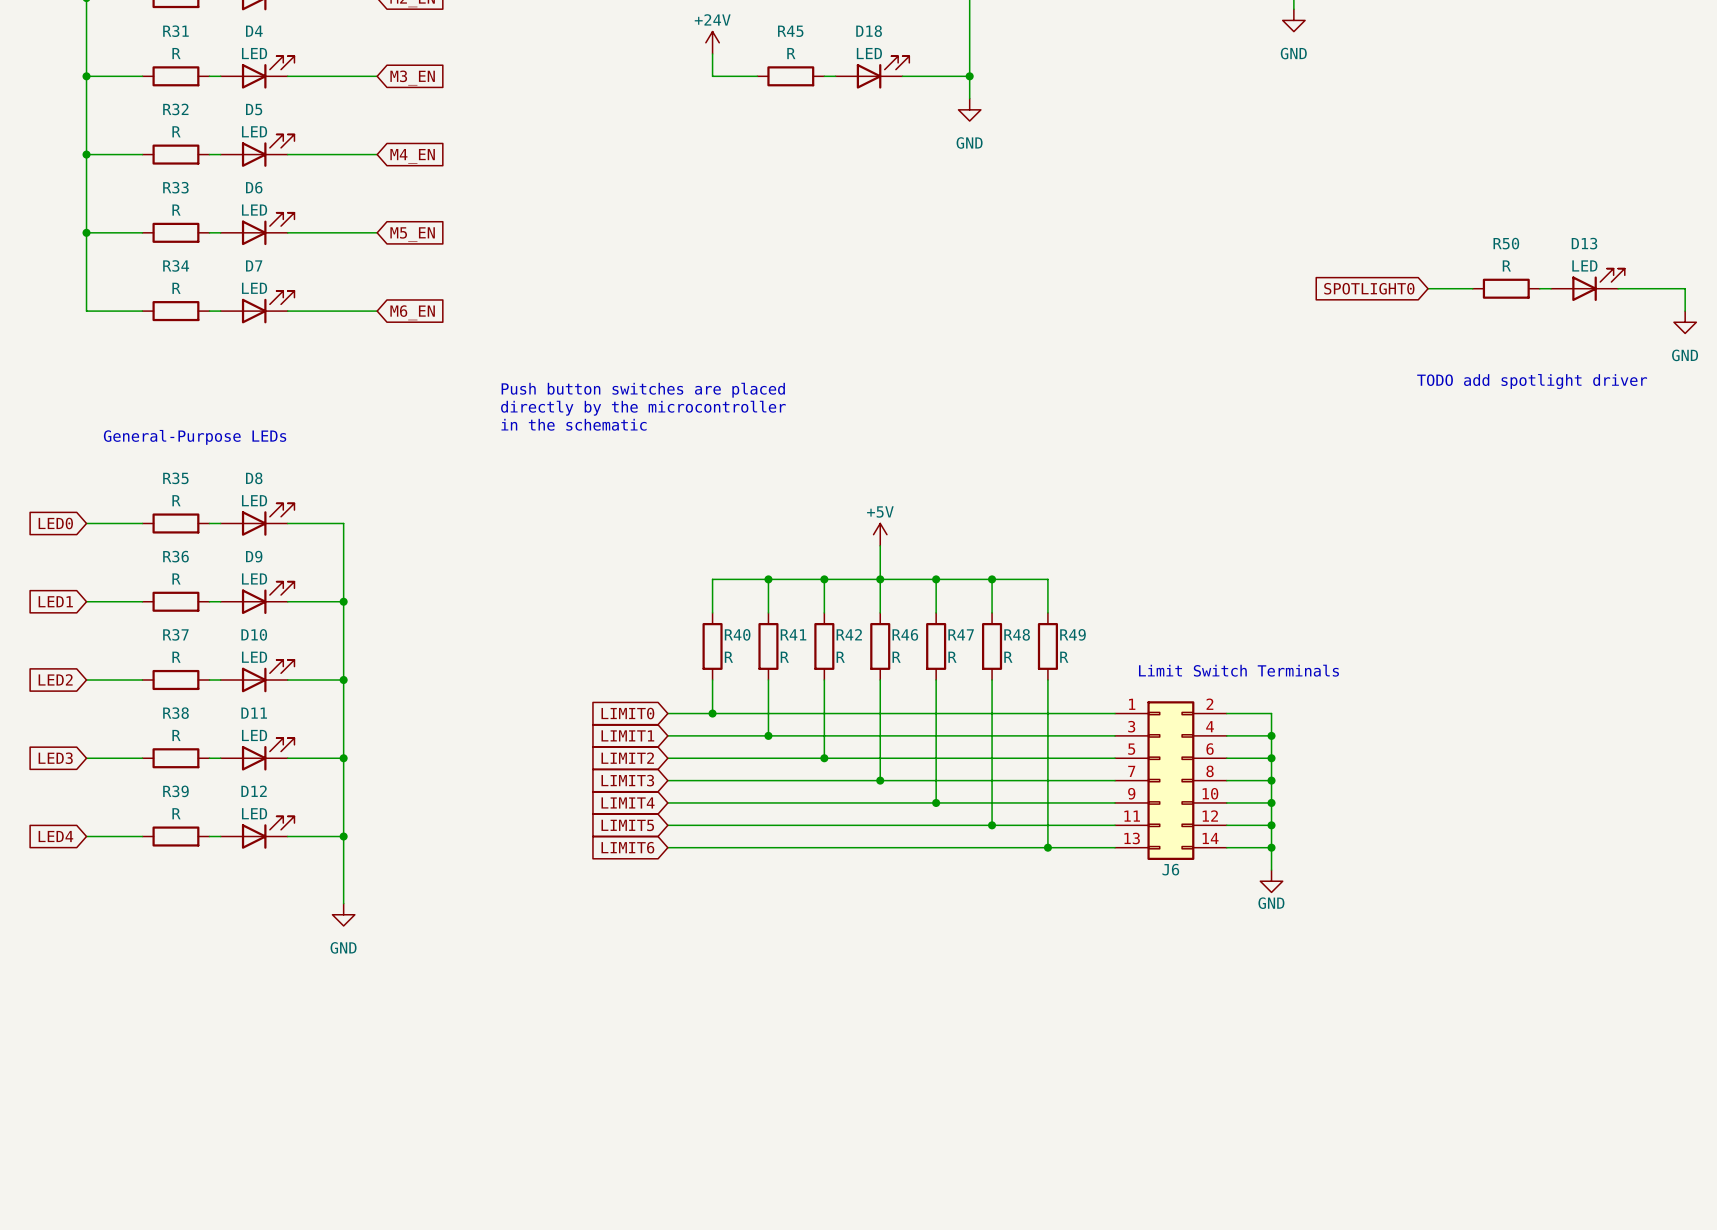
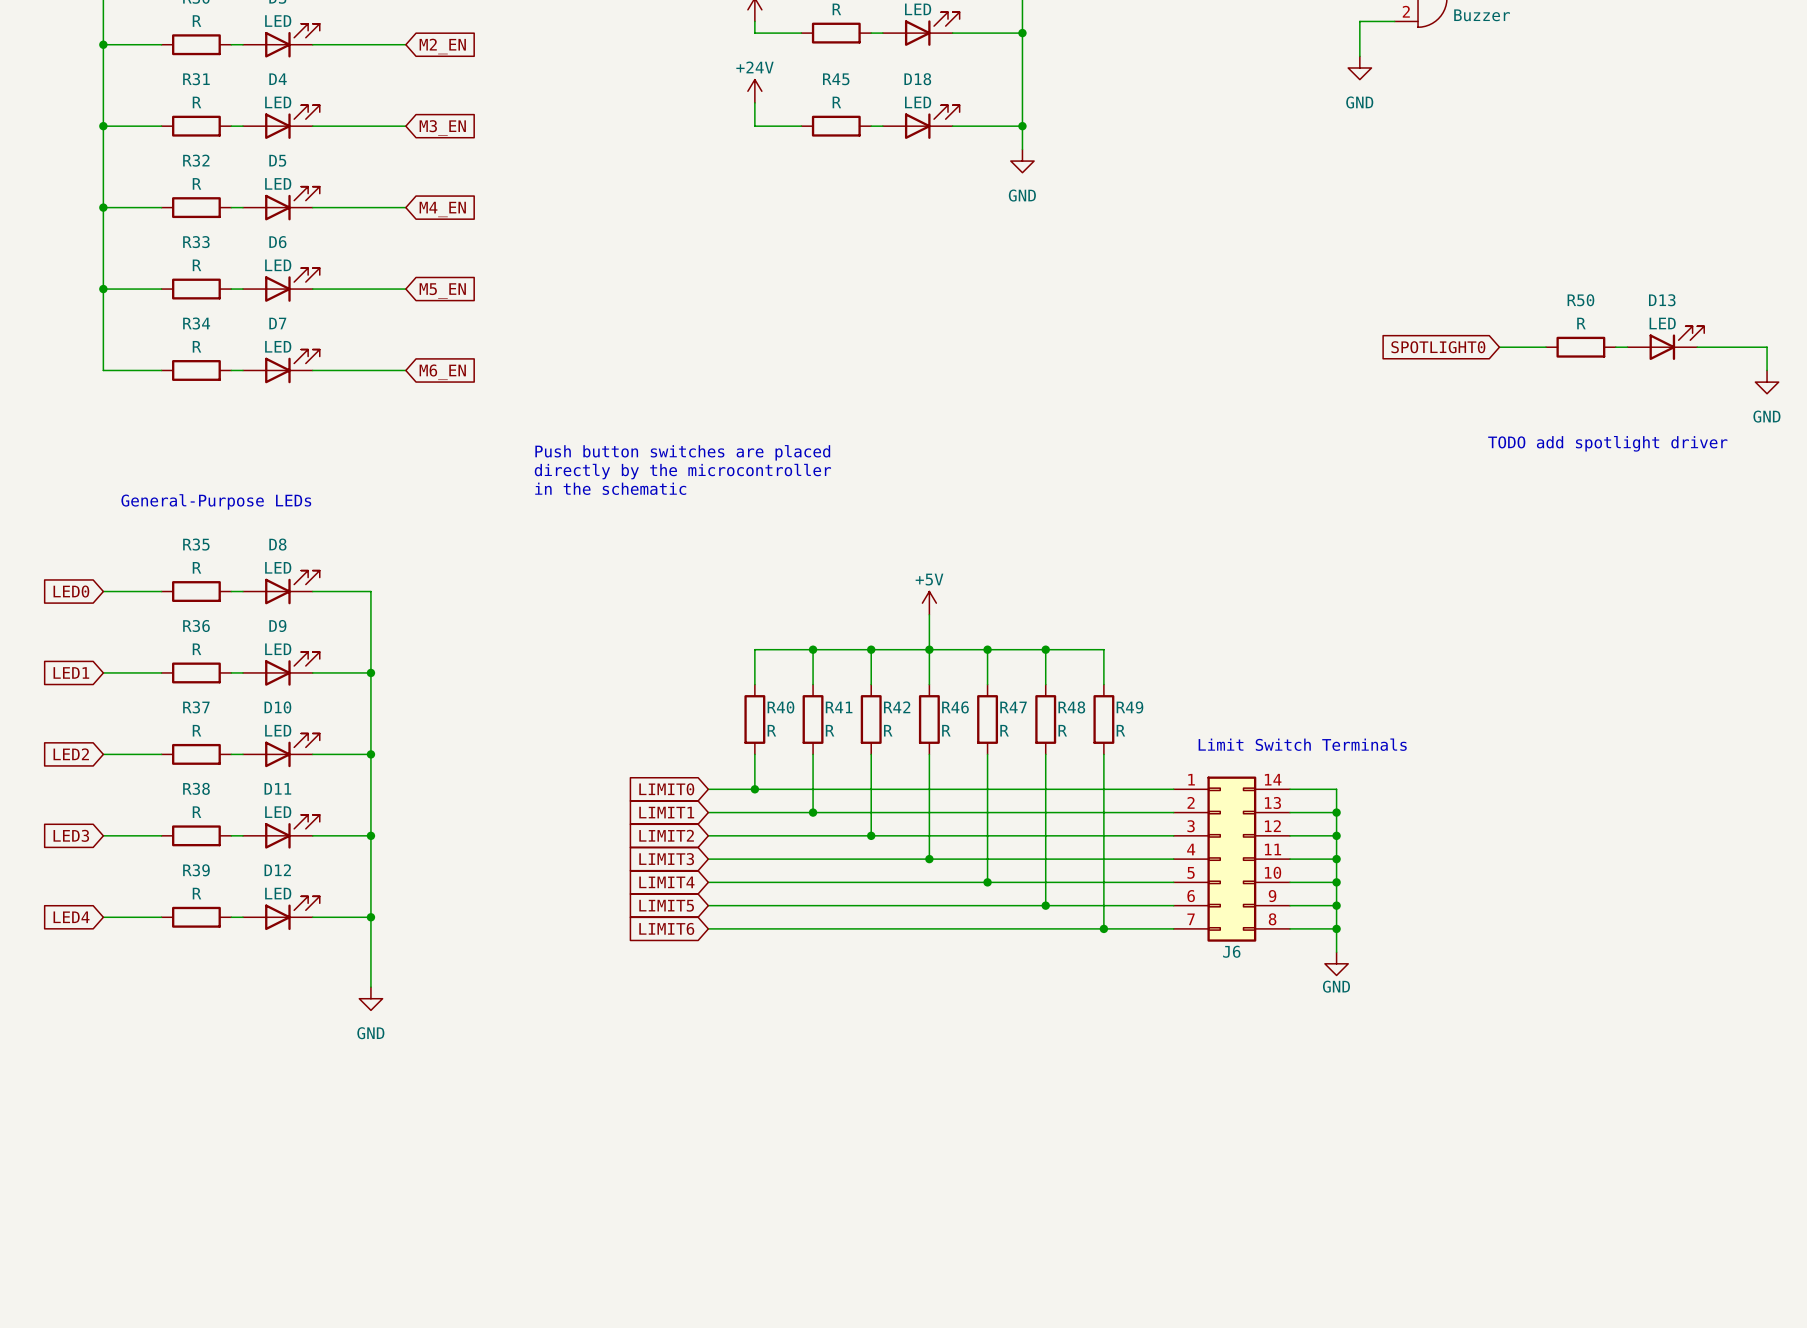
J6 symbol: [1115, 701, 1227, 860] -> [1173, 776, 1291, 942]

